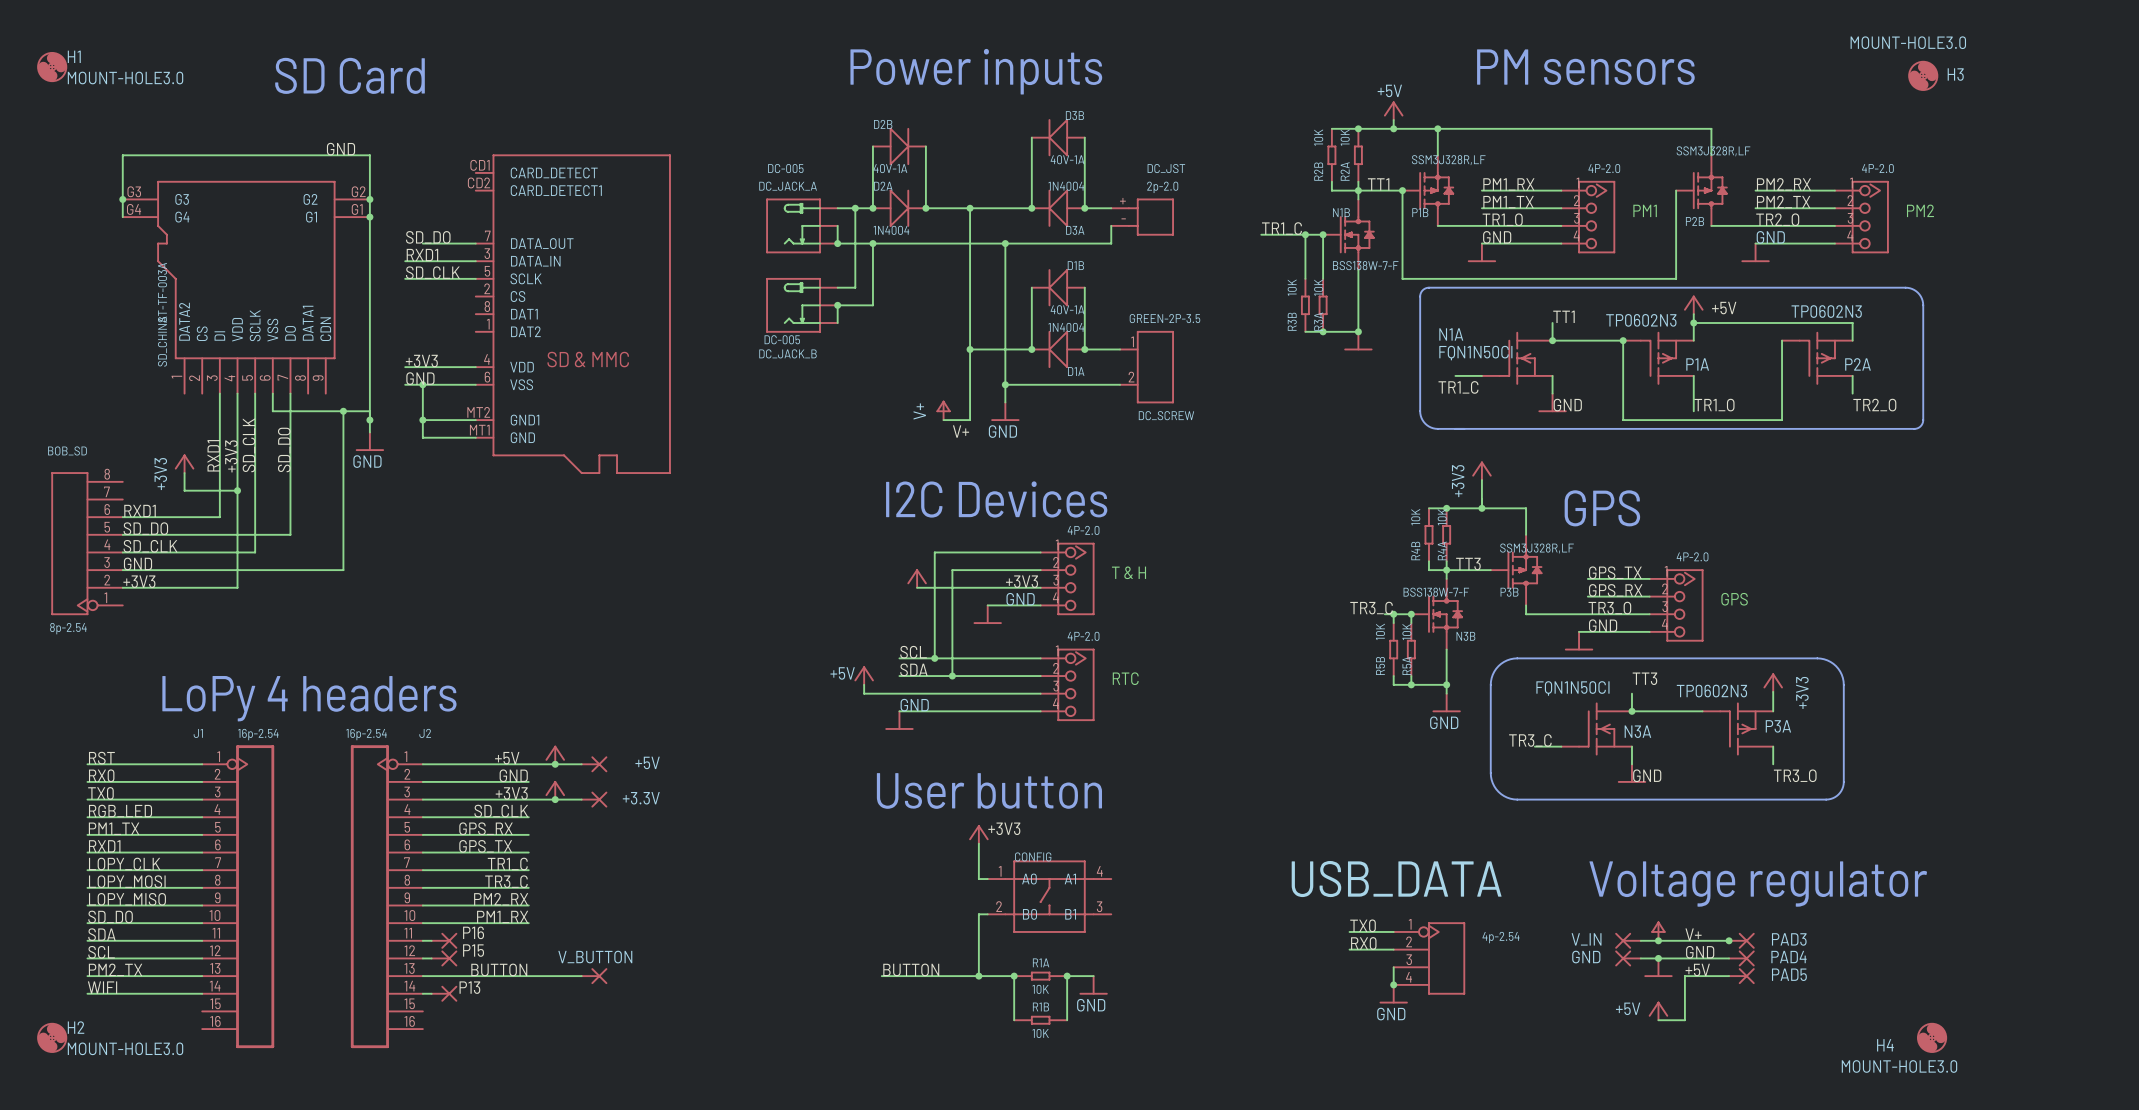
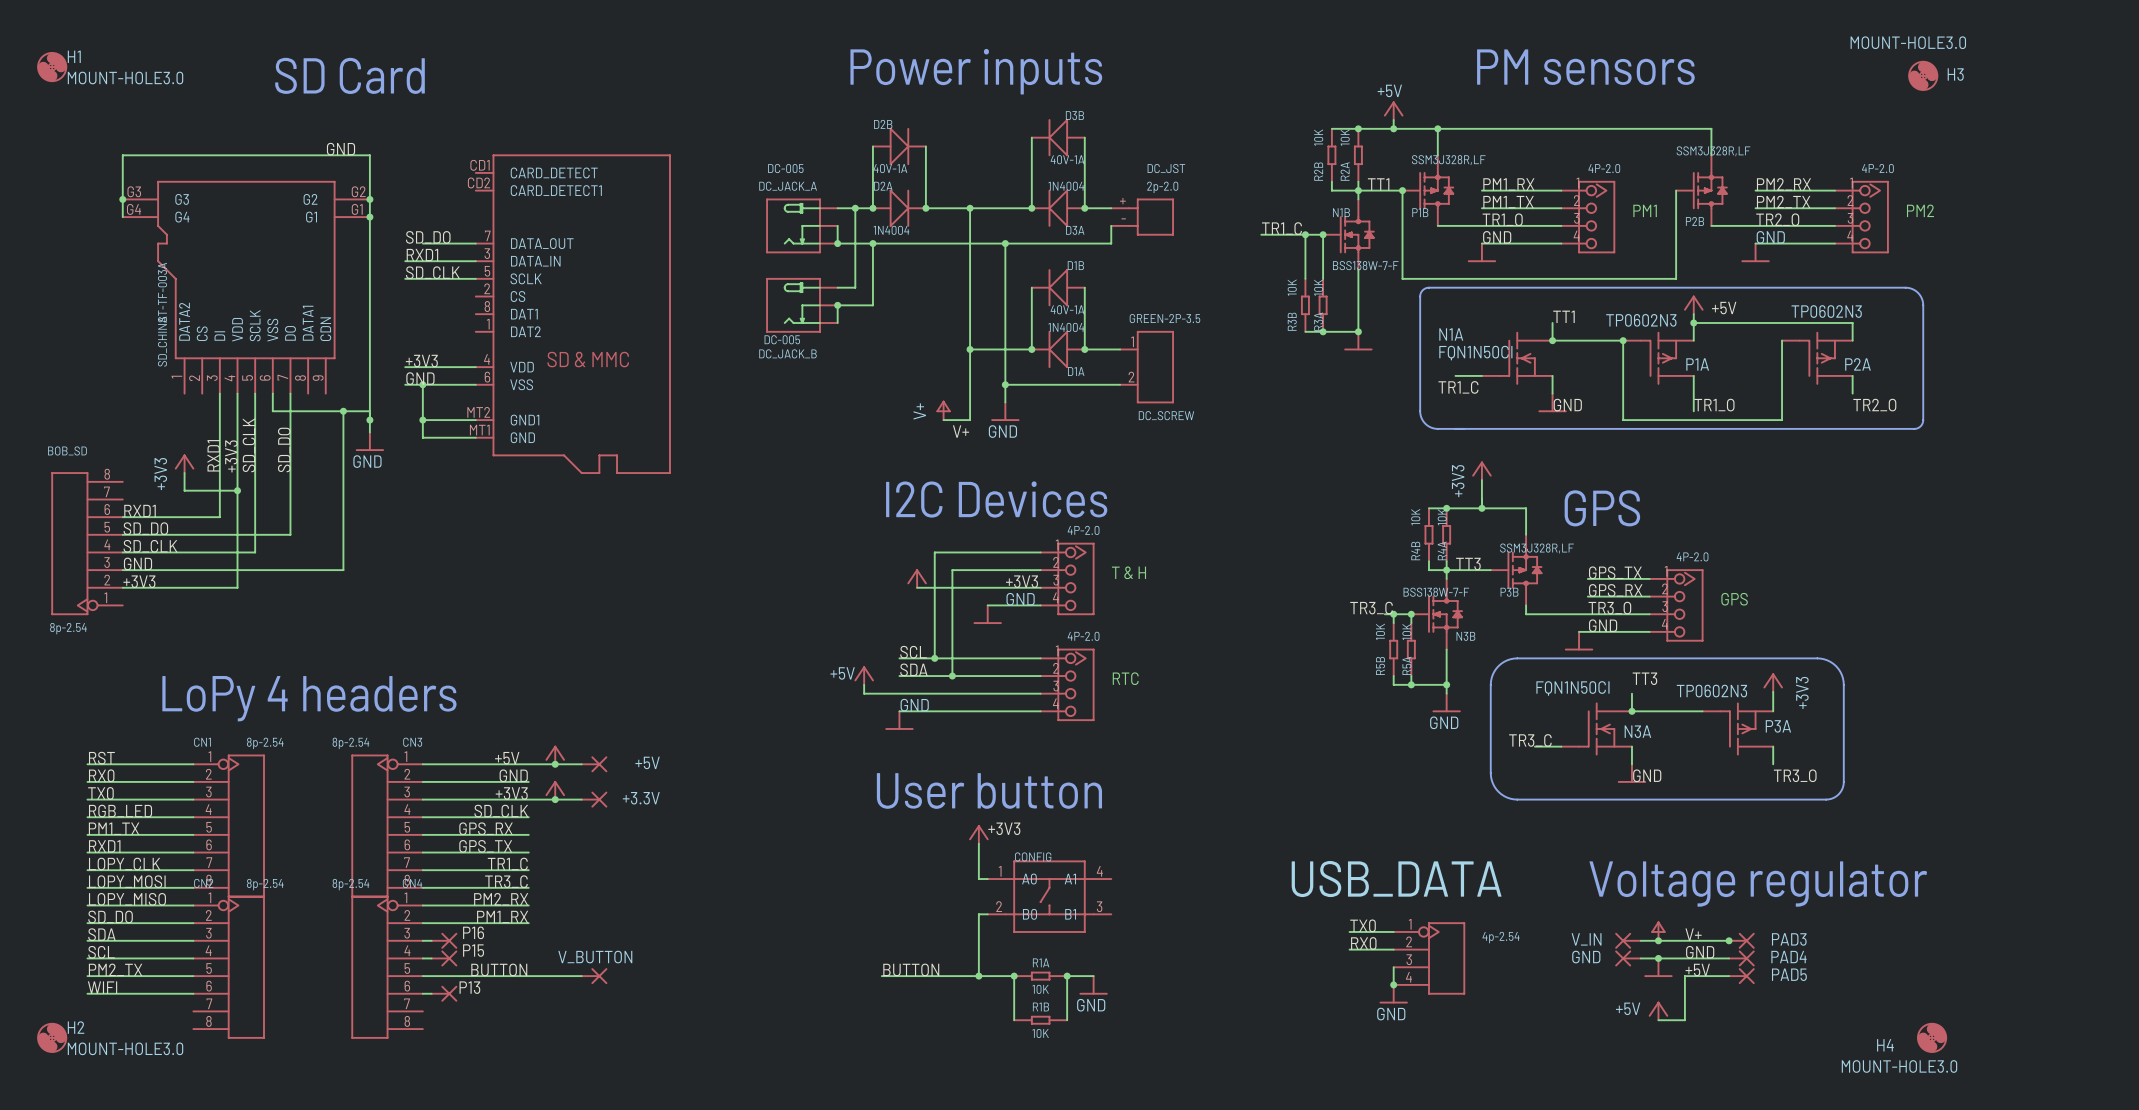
CN1: none -> 8p-2.54 (229, 826)
CN3: none -> 8p-2.54 (387, 826)
J1: 16p-2.54 (238, 896) -> none
J2: 16p-2.54 (386, 896) -> none
CN2: none -> 8p-2.54 (229, 967)
CN4: none -> 8p-2.54 (387, 967)

